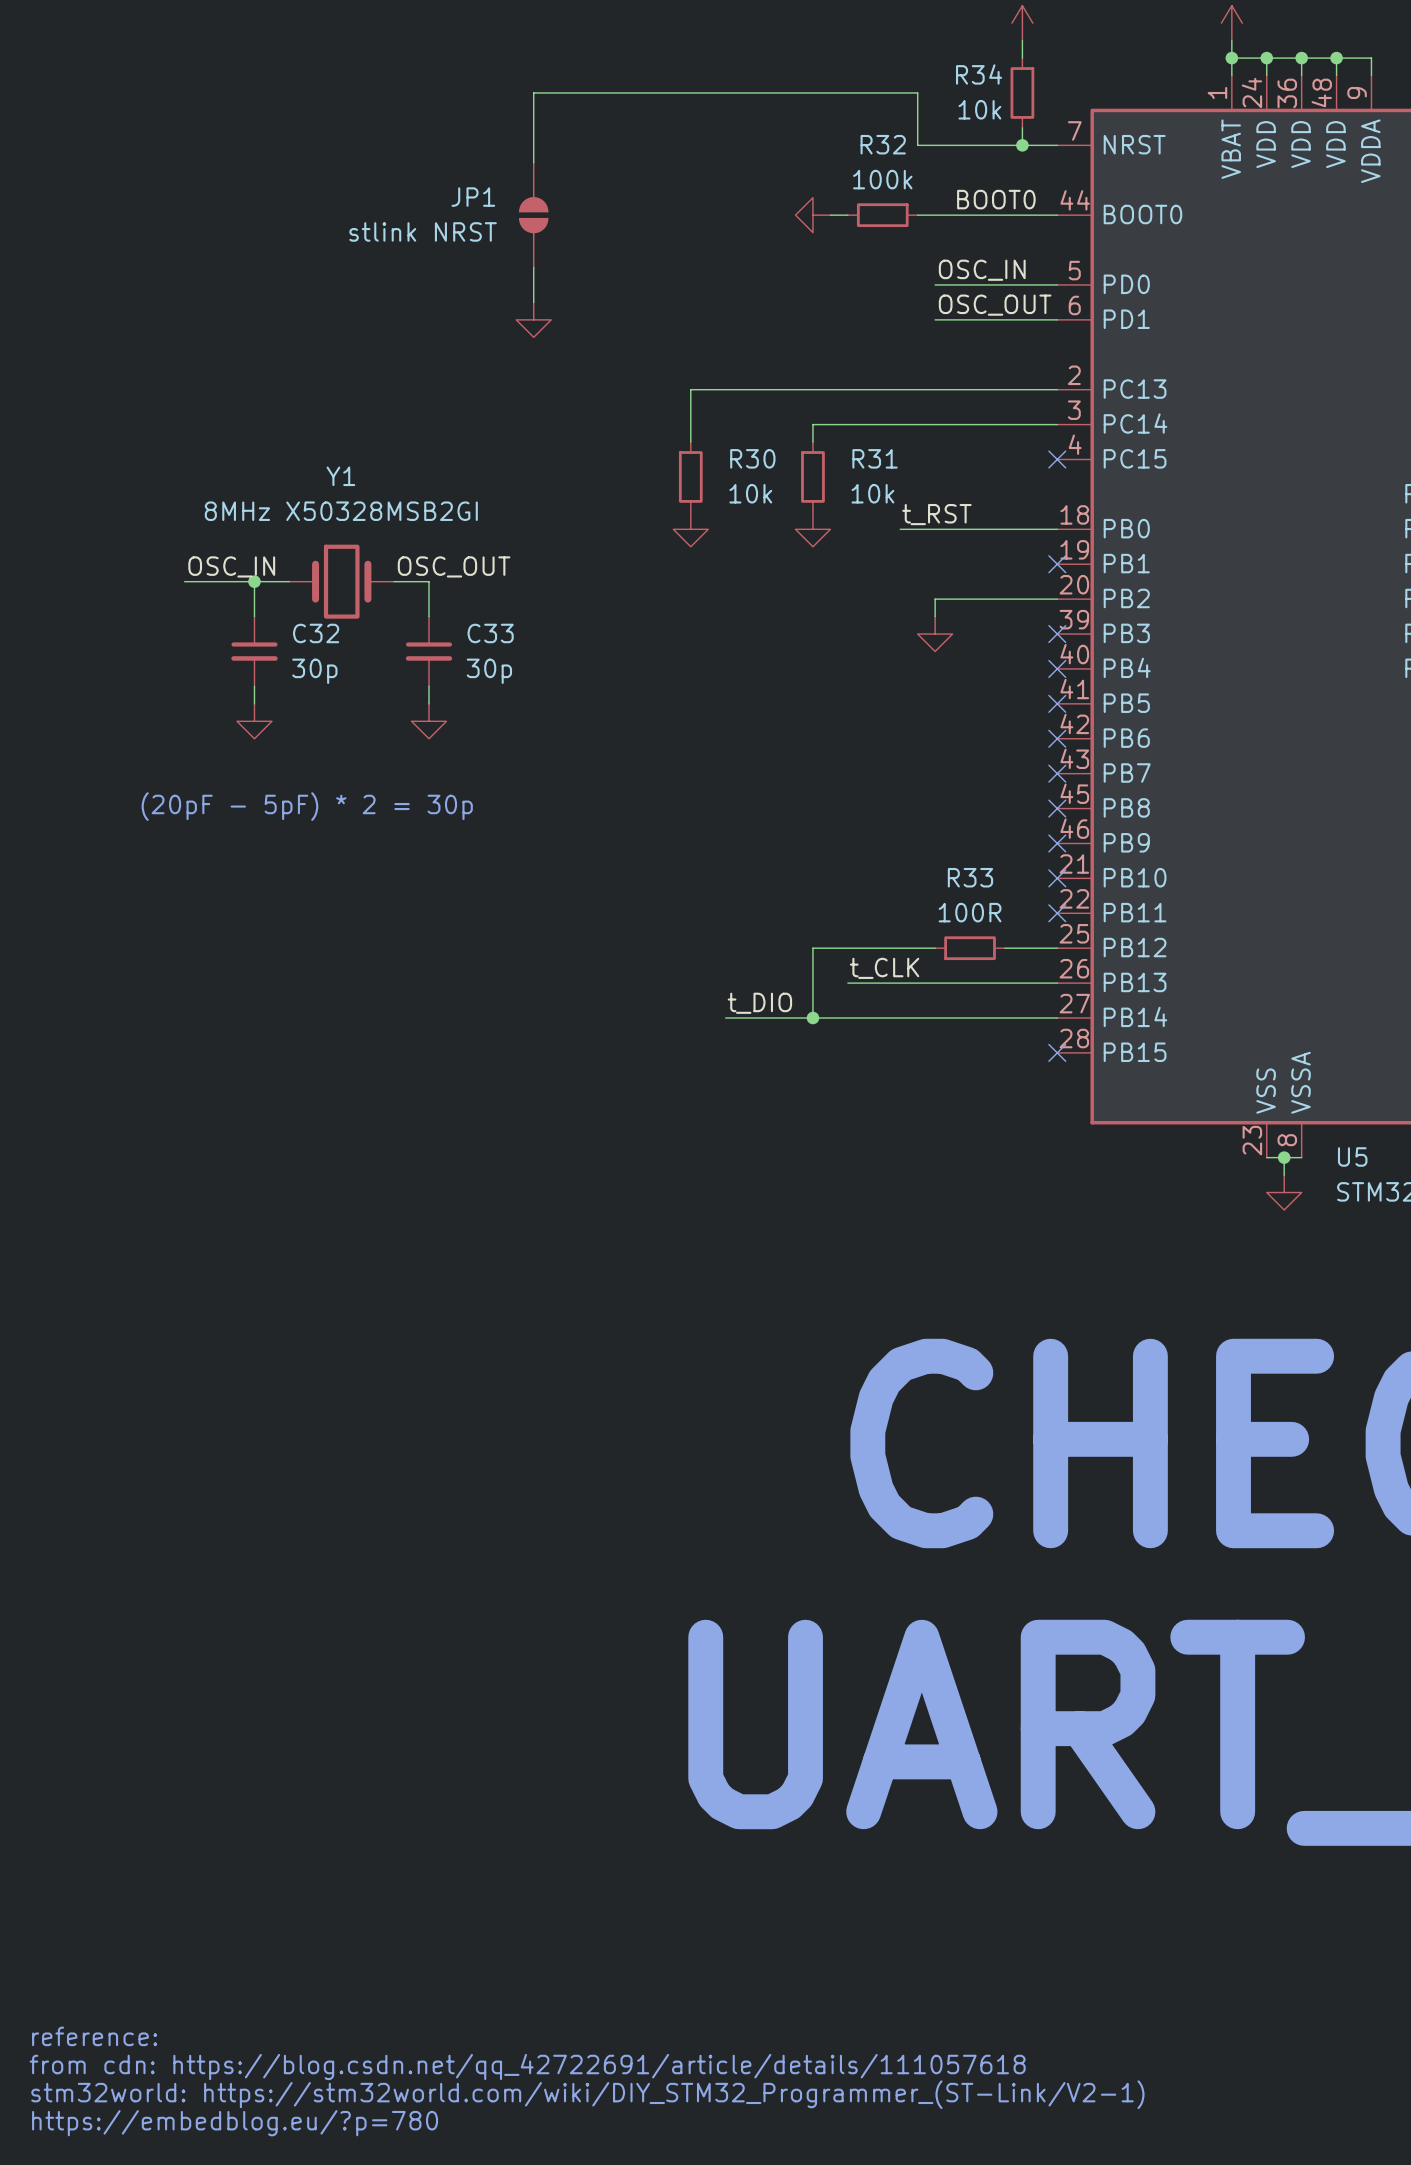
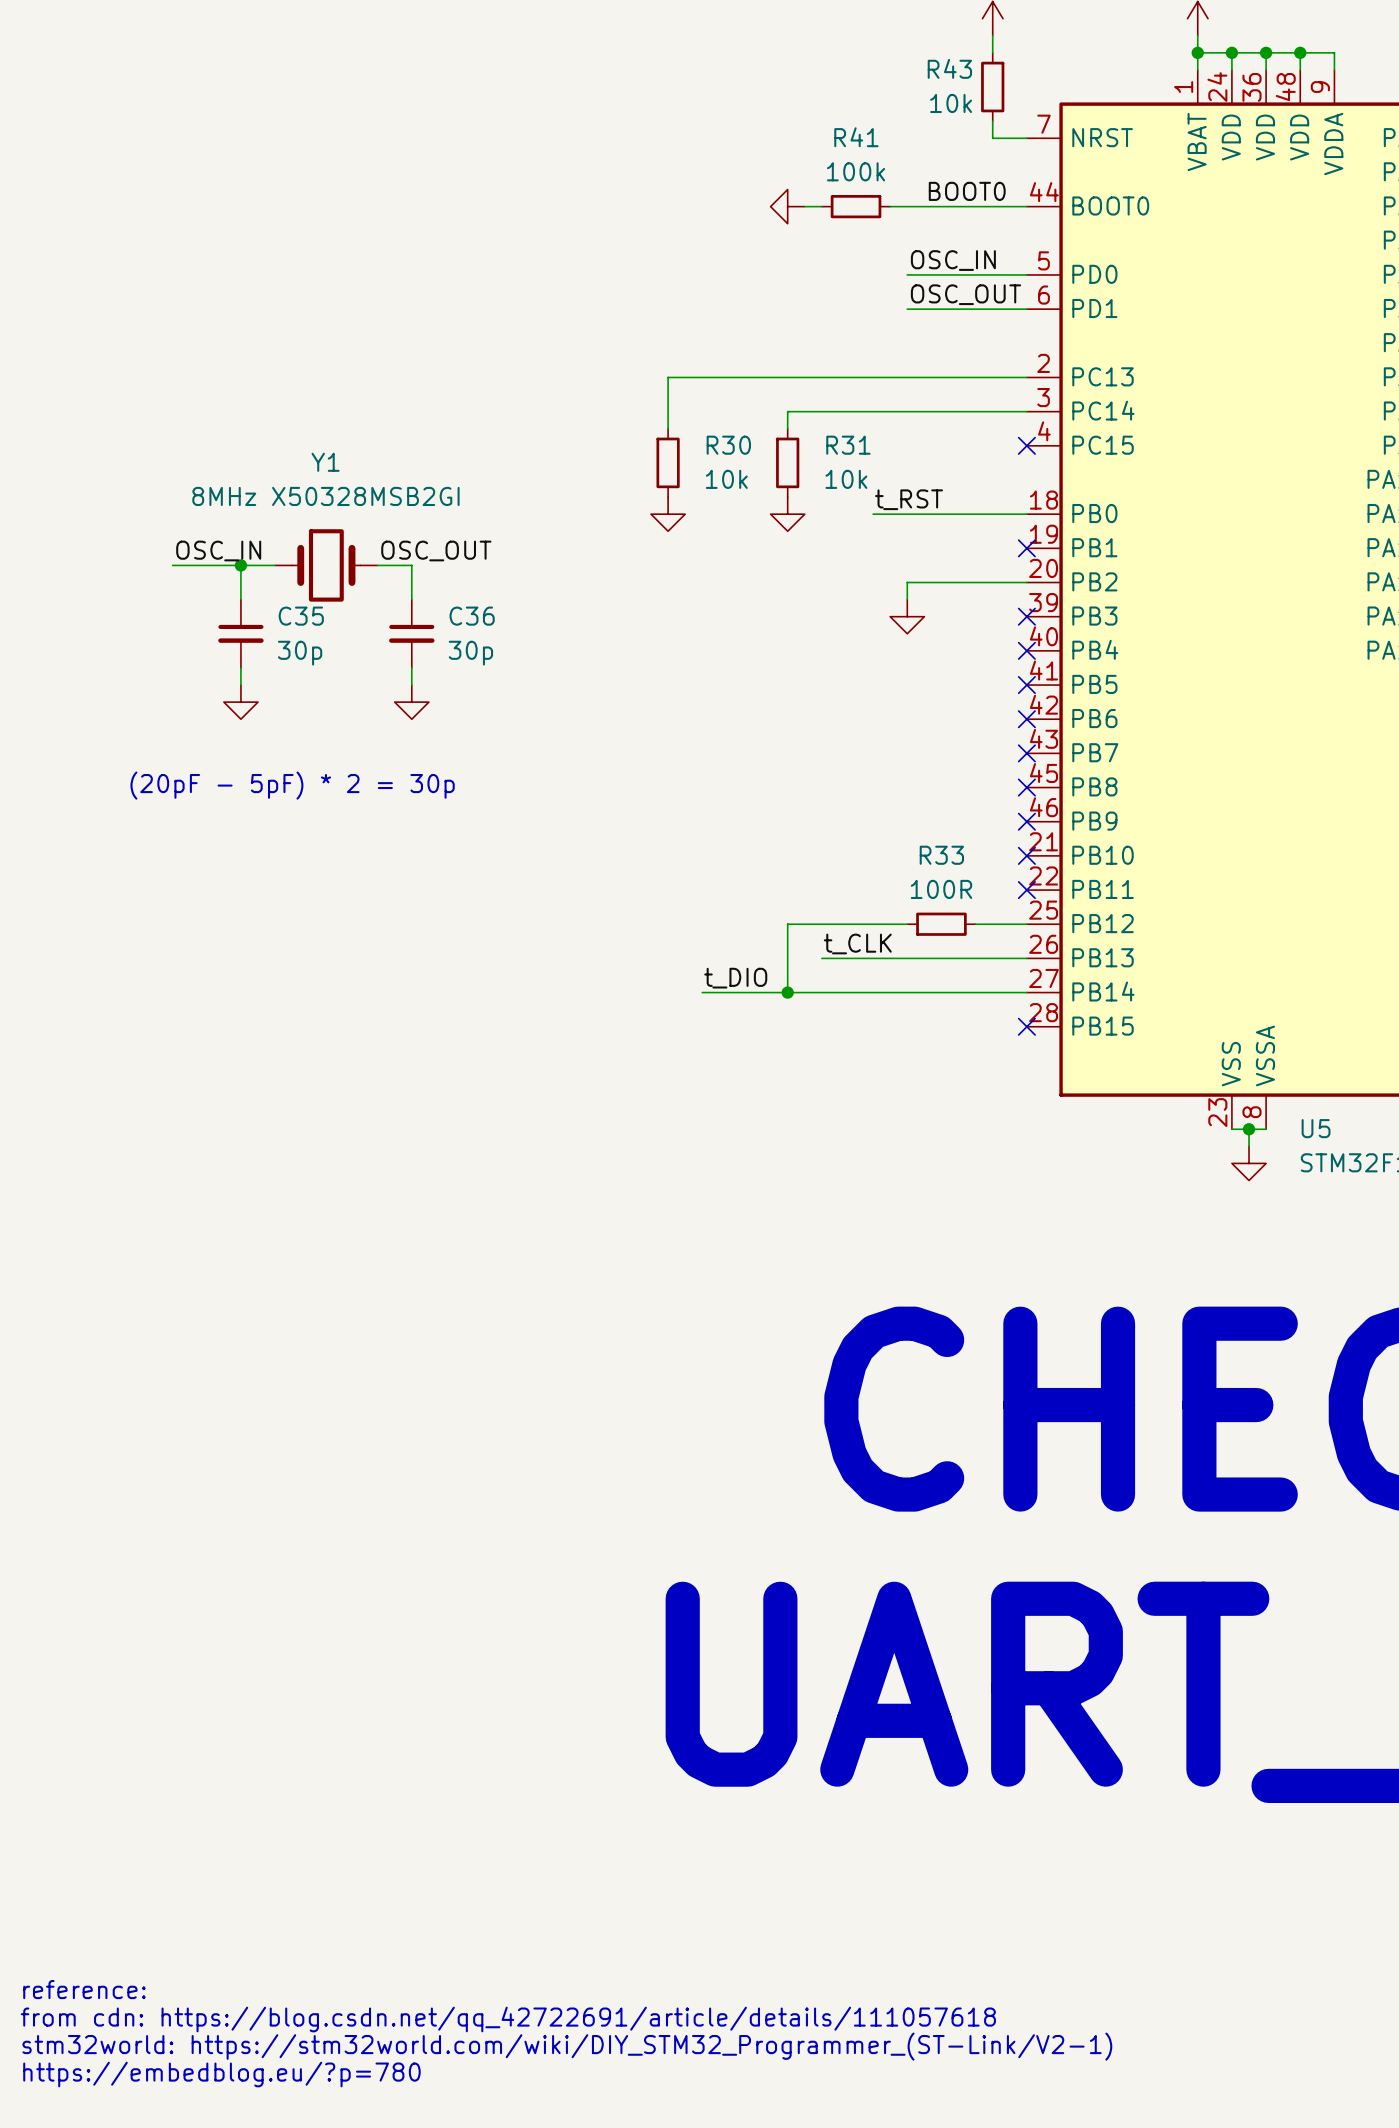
R34 name: R34 (979, 74) -> R43 (949, 68)
R32 name: R32 (883, 144) -> R41 (856, 137)
wire: (1022, 145) (917, 145) (917, 92) (533, 92) (533, 162) -> none
junction: (1022, 145) -> none
JP1: stlink NRST (533, 215) -> none
wire: (533, 267) (533, 302) -> none
power symbol: (533, 319) -> none
C32 name: C32 (316, 633) -> C35 (301, 616)
C33 name: C33 (490, 633) -> C36 (472, 616)

